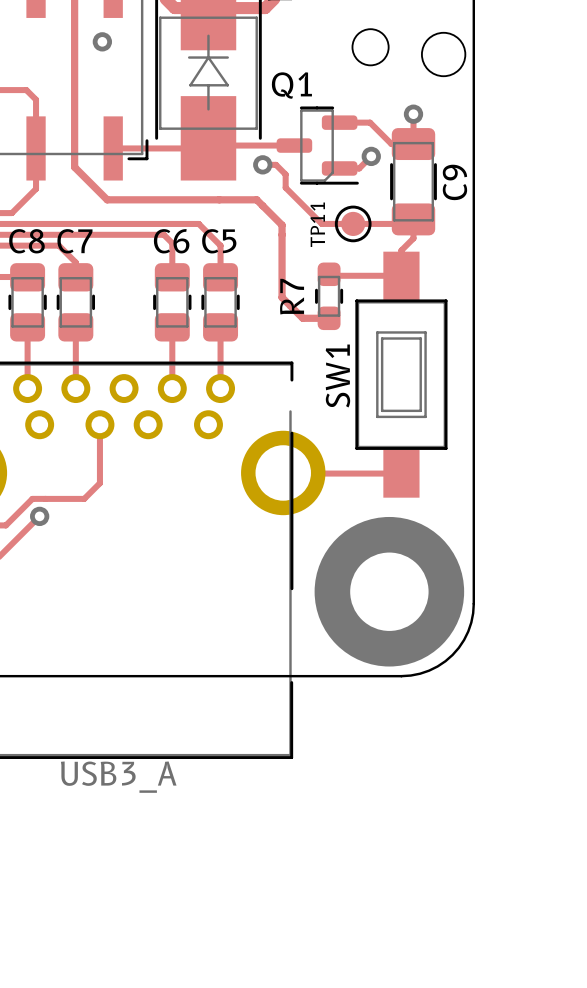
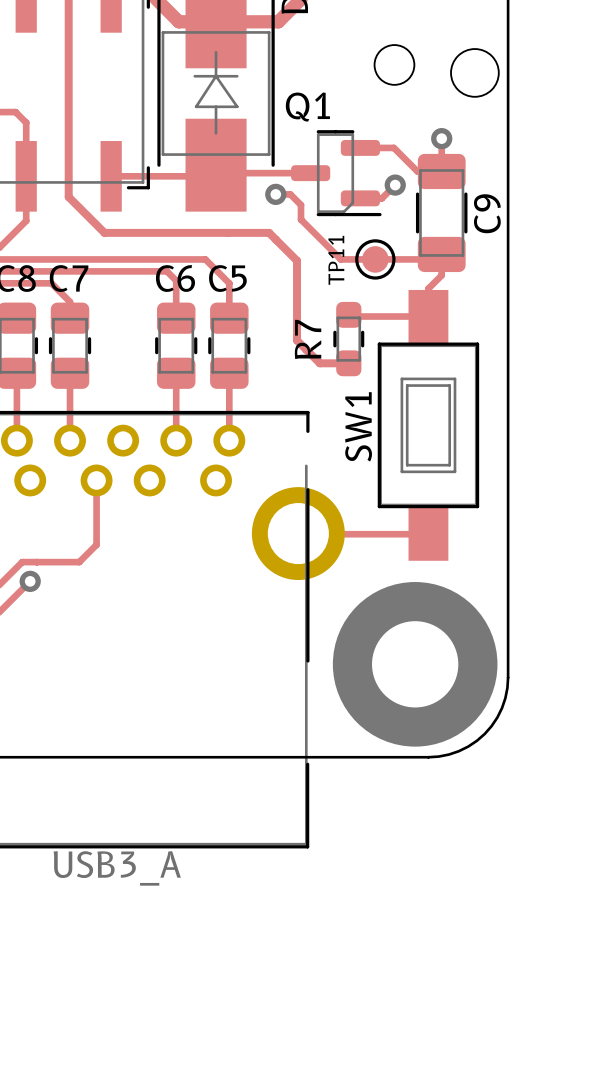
via: (102, 41) -> none

